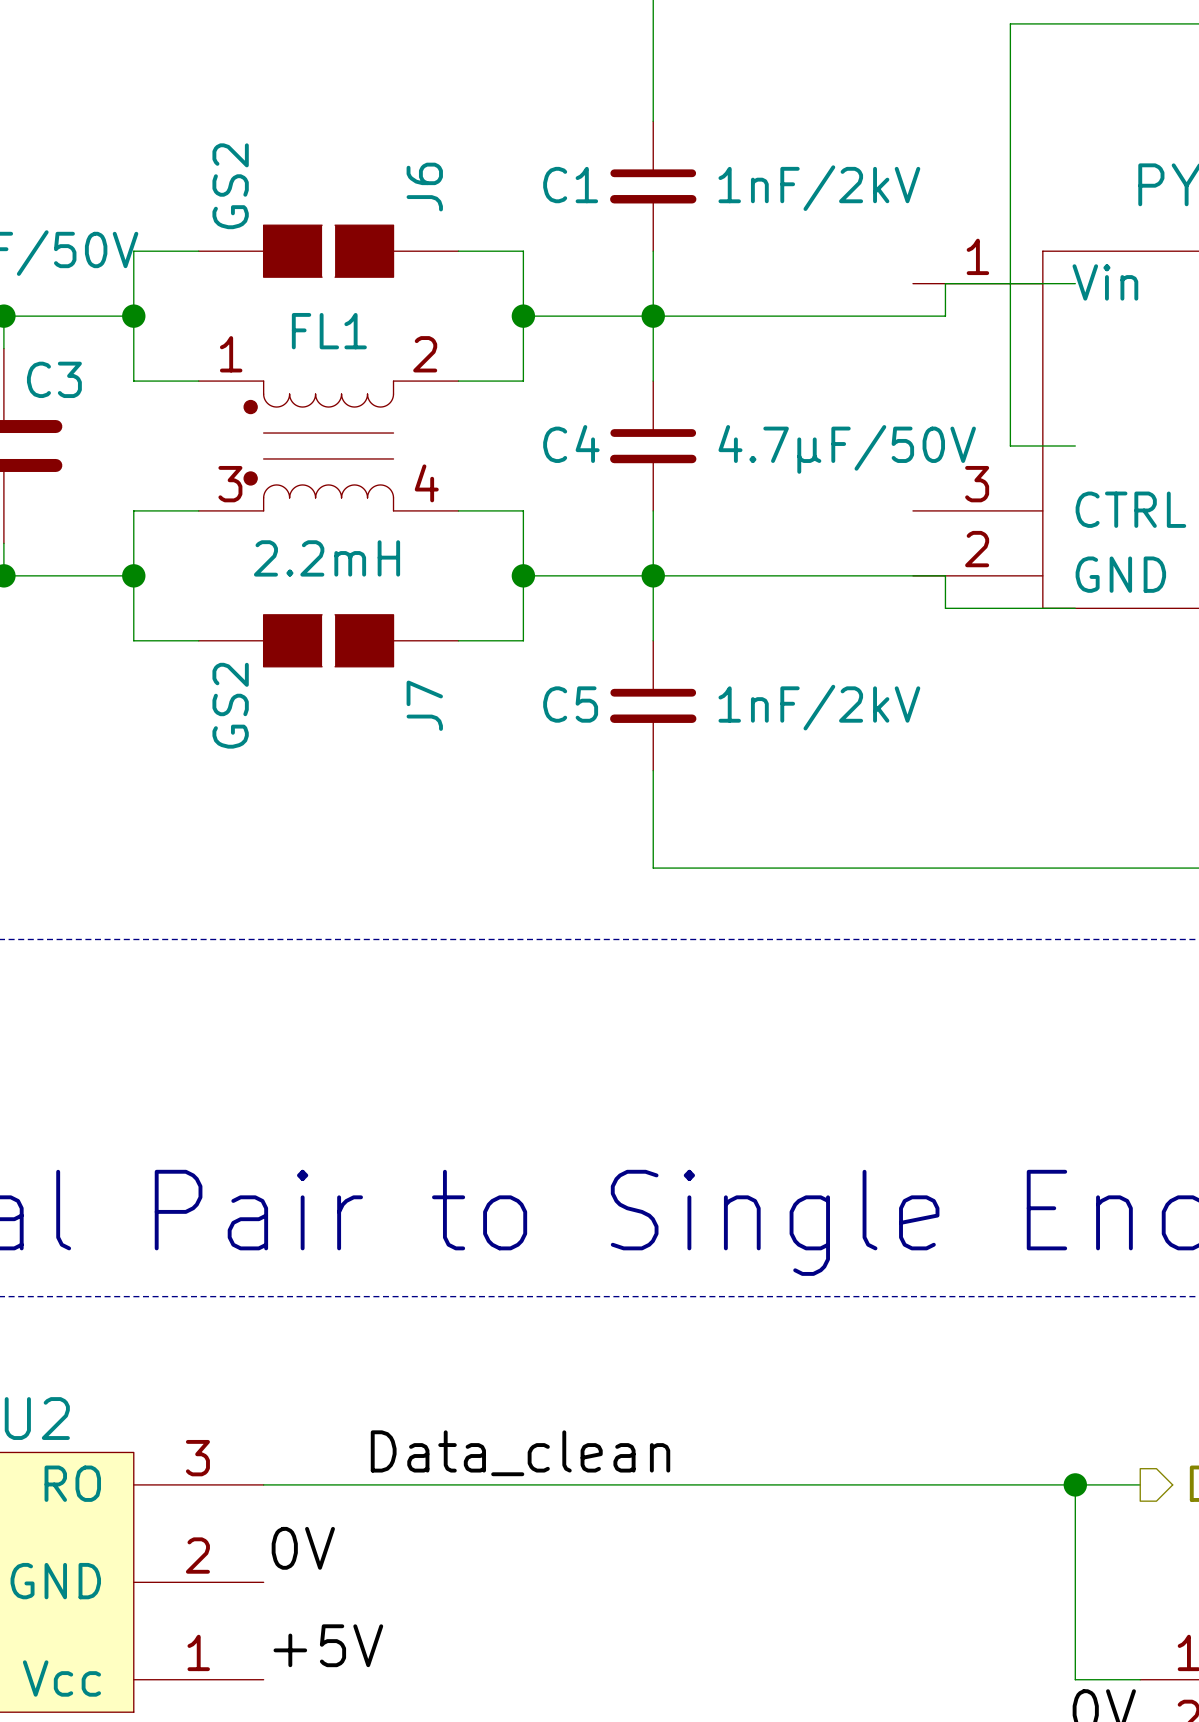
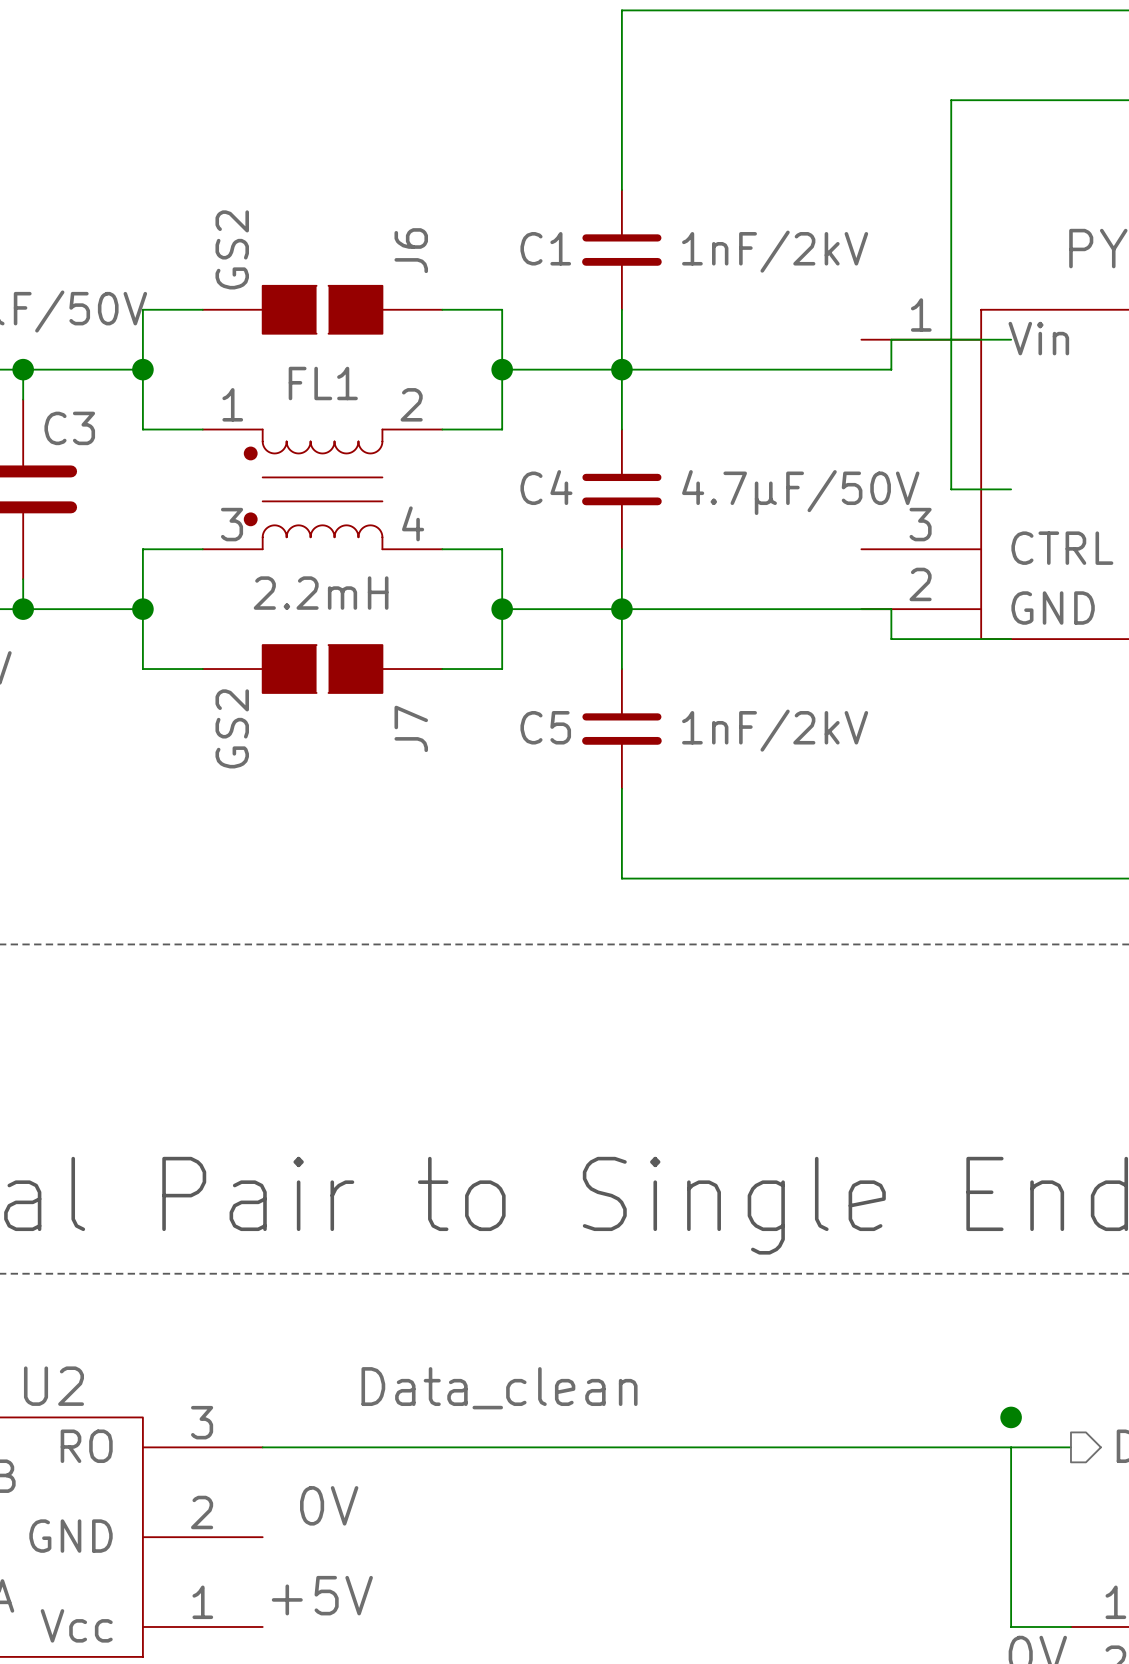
label position: Data_clean (520, 1453) -> Data_clean (499, 1388)
junction position: (1075, 1484) -> (1011, 1417)
label position: 0V (303, 1548) -> 0V (329, 1505)

